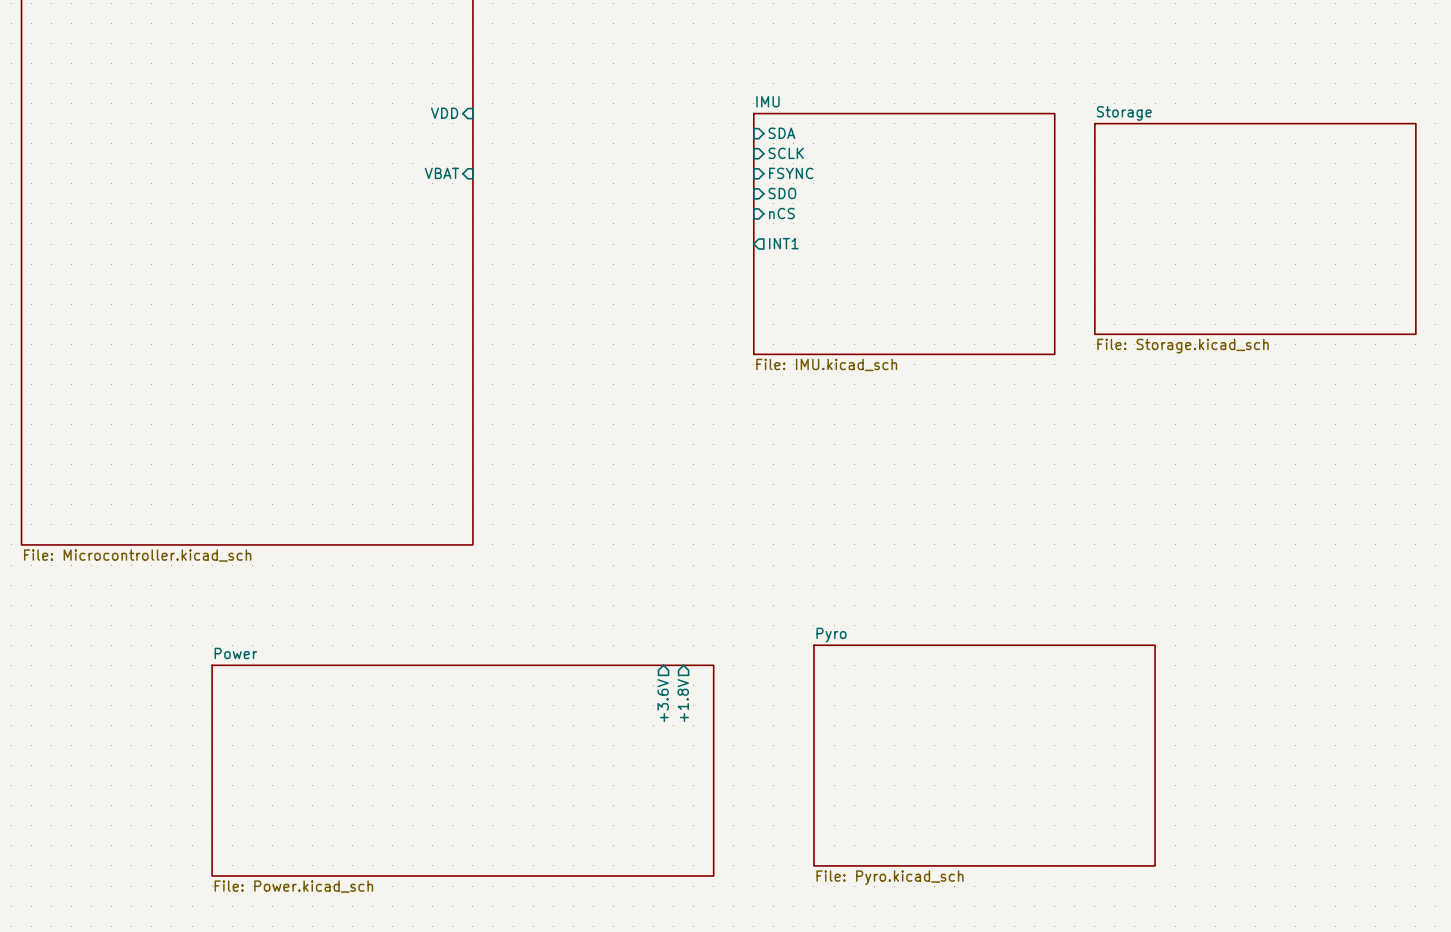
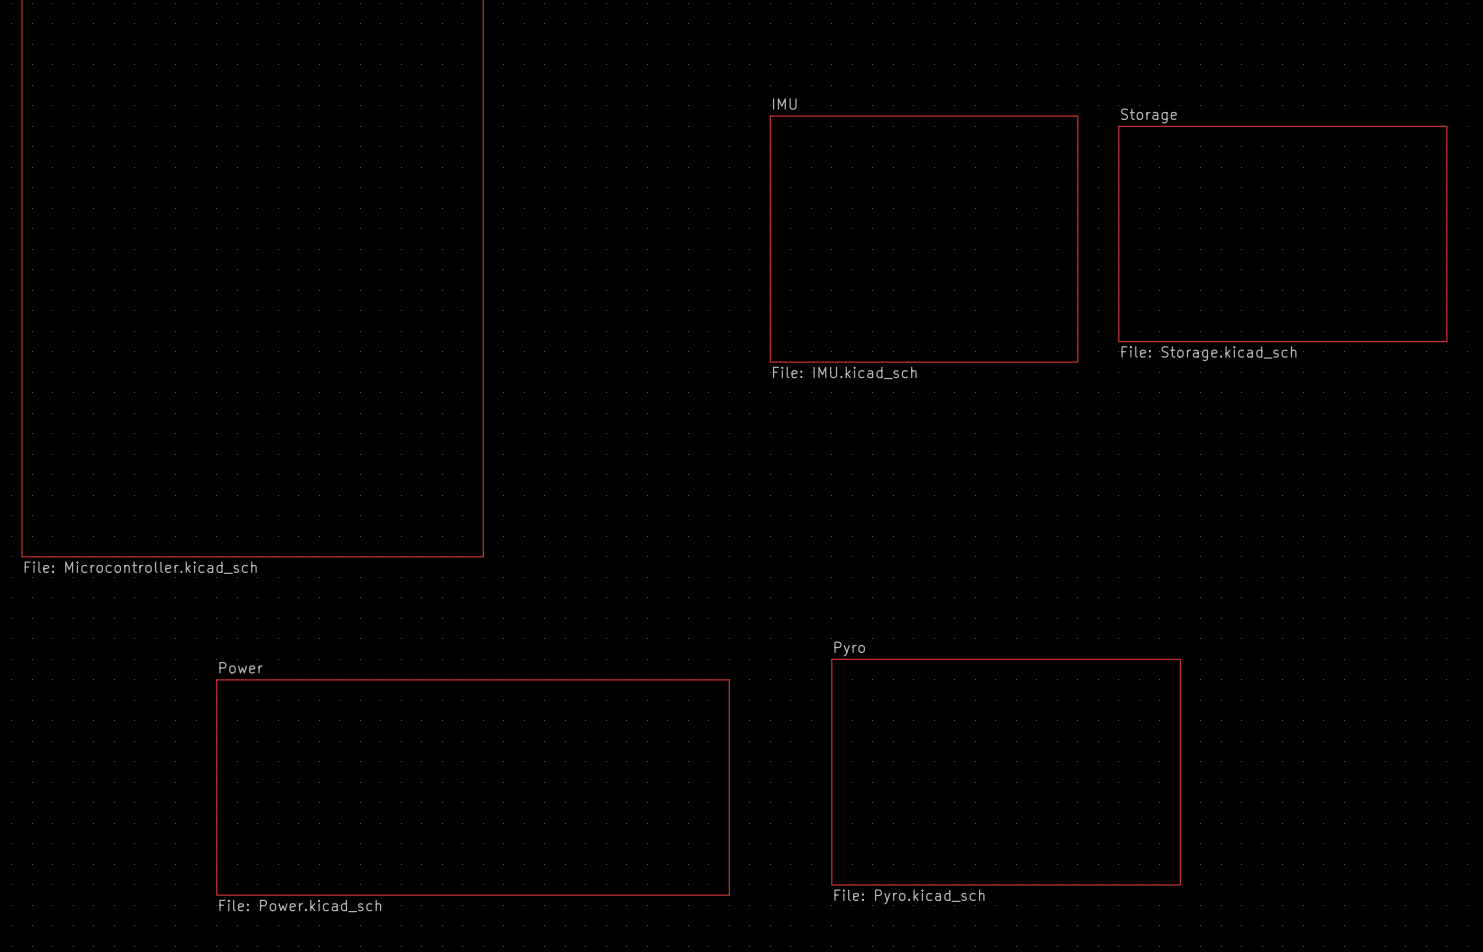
sheet pin: VDD (444, 113) -> none
sheet pin: SDA (781, 133) -> none
sheet pin: SCLK (786, 153) -> none
sheet pin: VBAT (441, 173) -> none
sheet pin: FSYNC (791, 173) -> none
sheet pin: SDO (782, 193) -> none
sheet pin: nCS (781, 213) -> none
sheet pin: INT1 (783, 243) -> none
sheet pin: +3.6V (663, 700) -> none
sheet pin: +1.8V (683, 700) -> none

